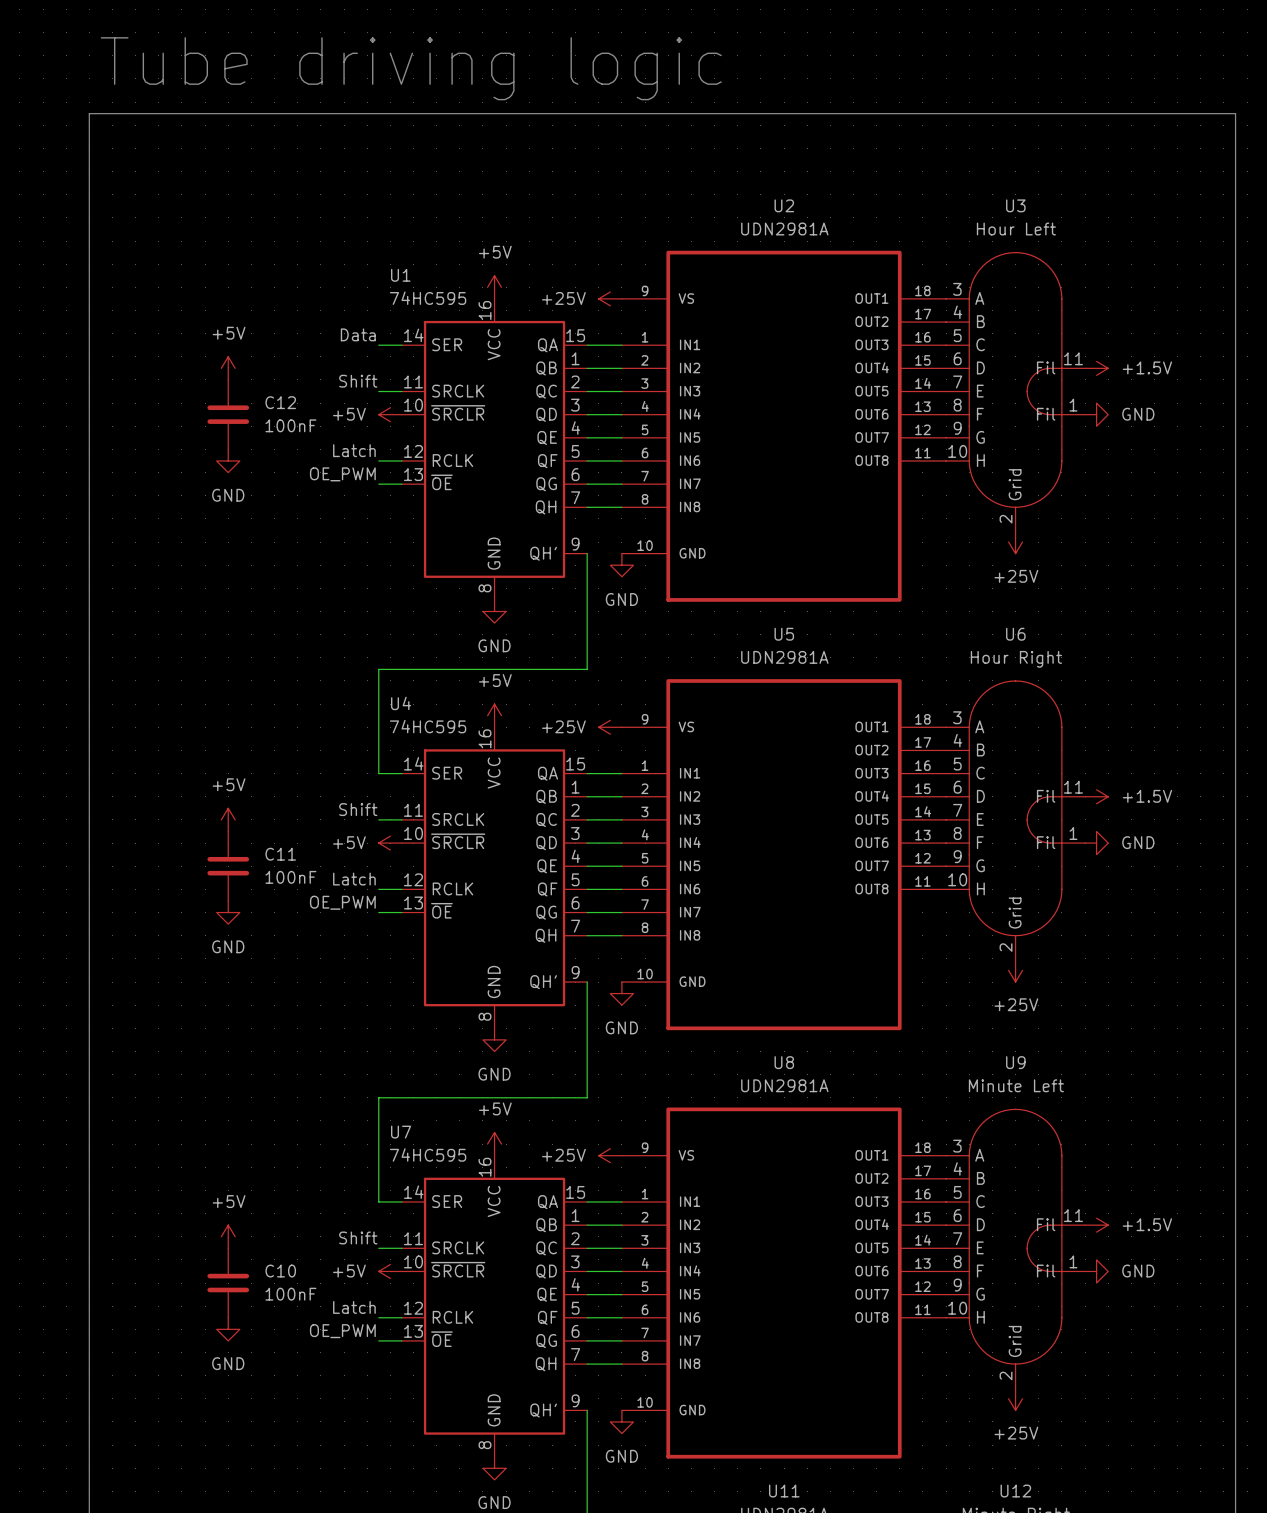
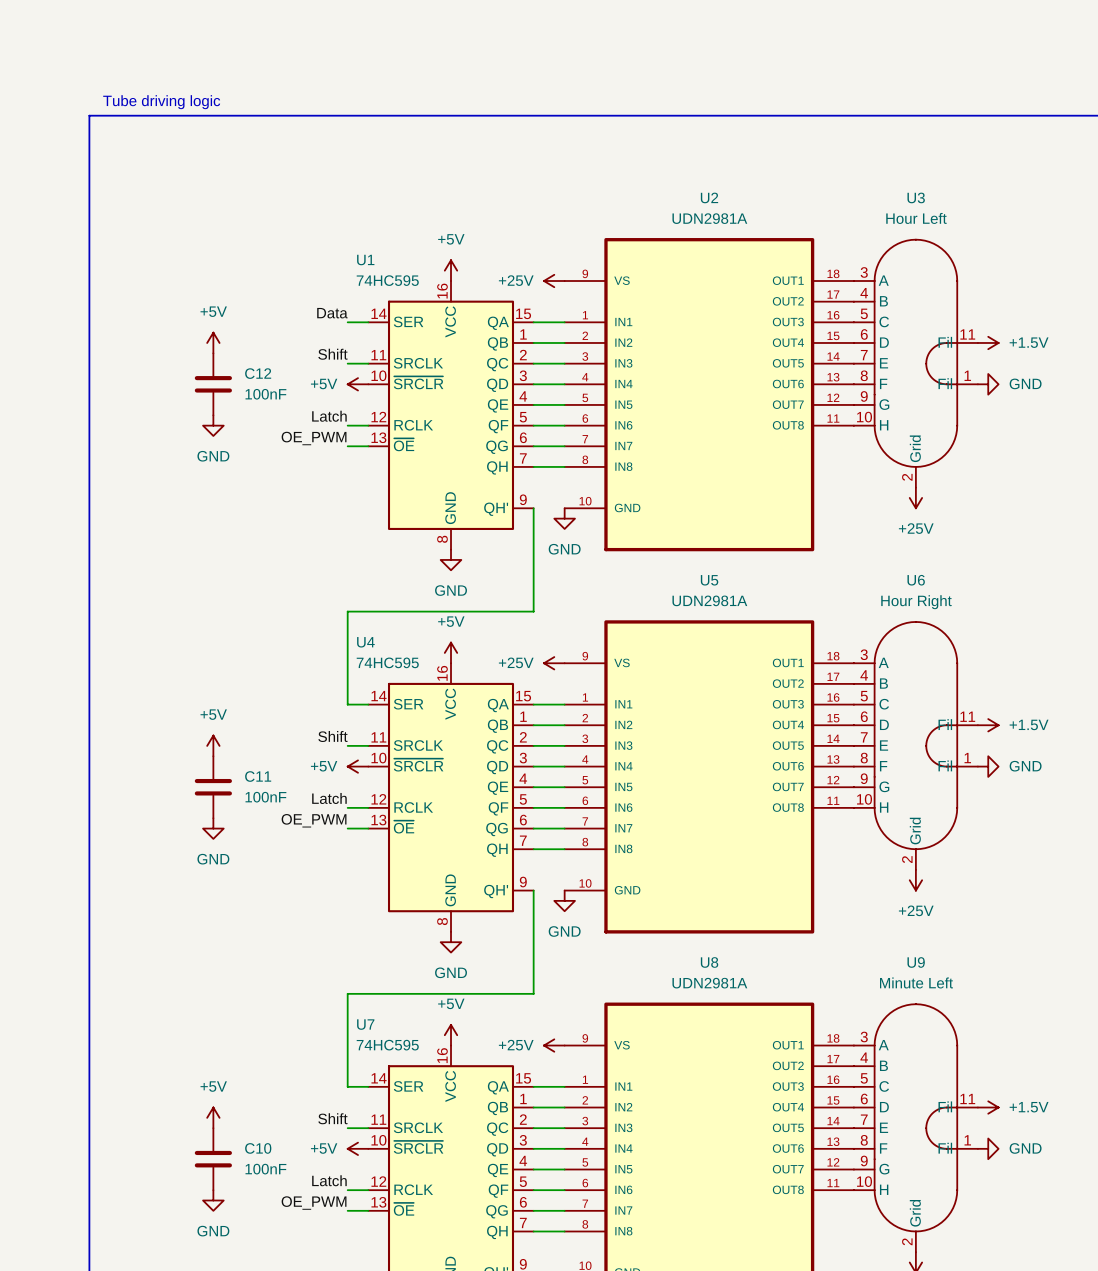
text: Tube driving logic (411, 68) -> none
text: none -> Tube driving logic (161, 102)

